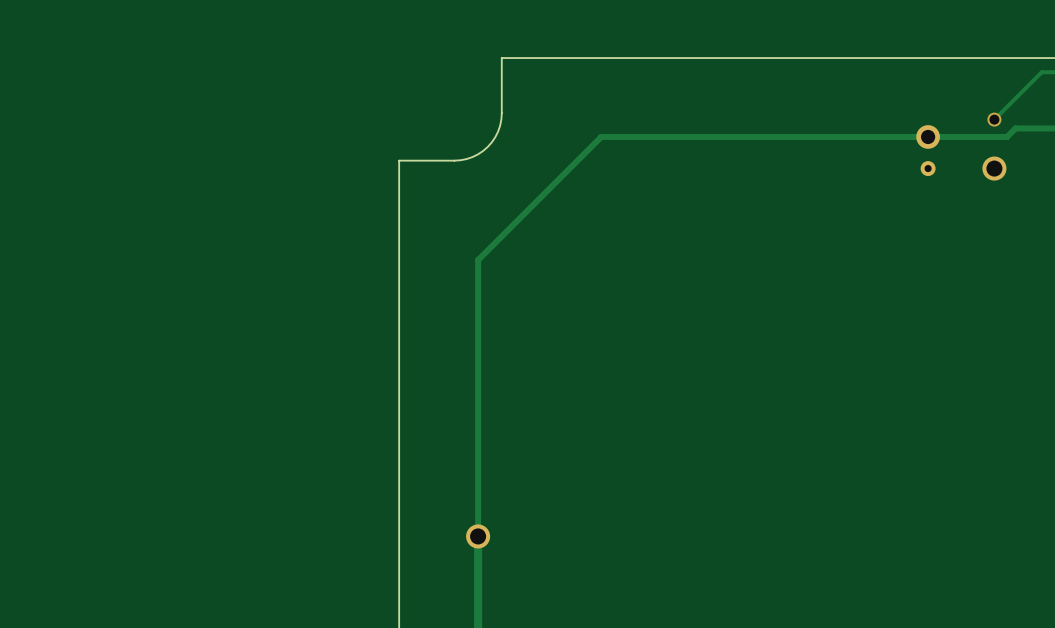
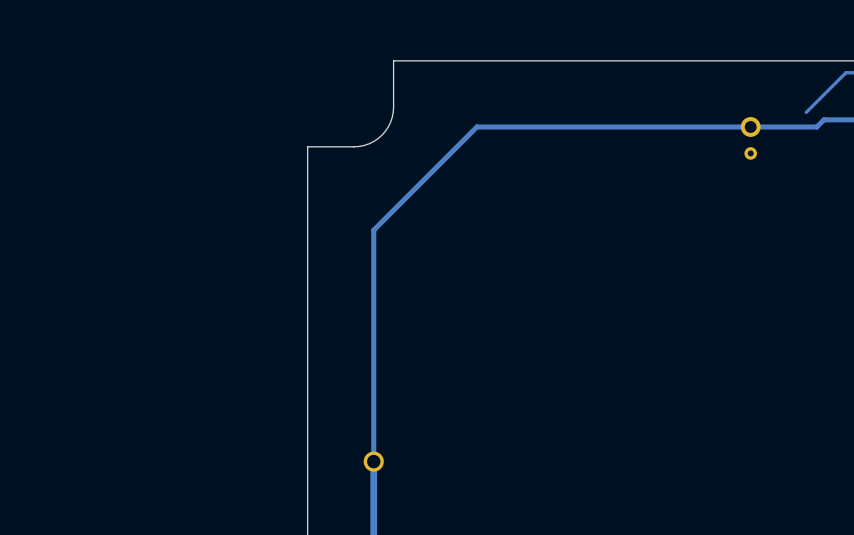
via: (994, 119) -> none
part: (994, 168) -> none

